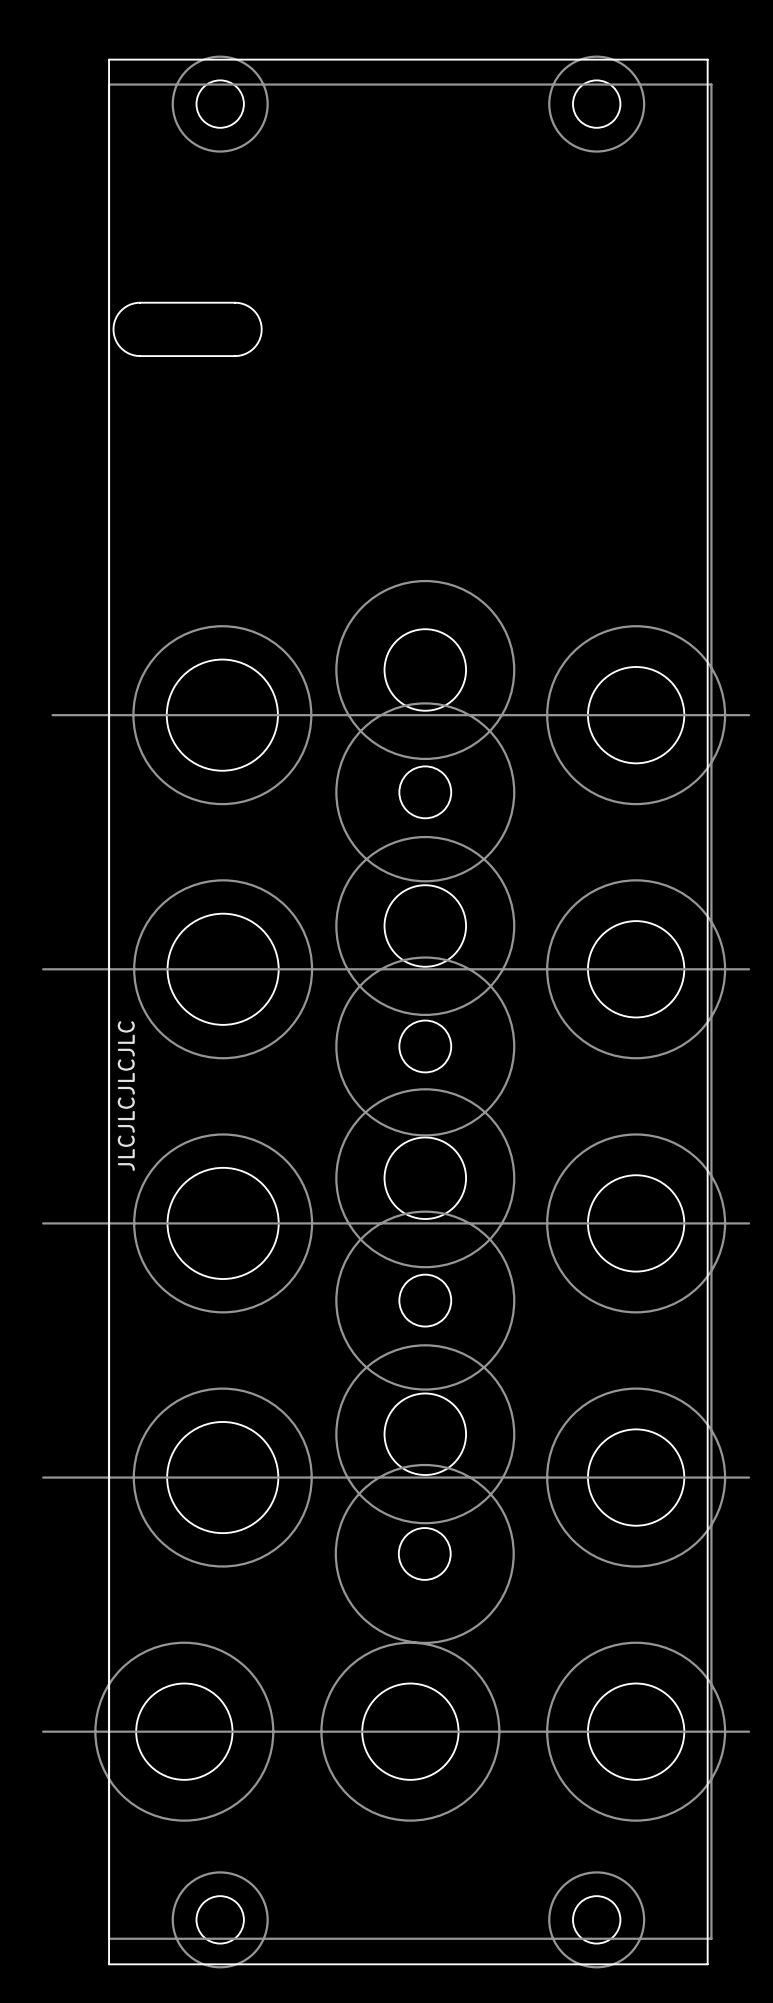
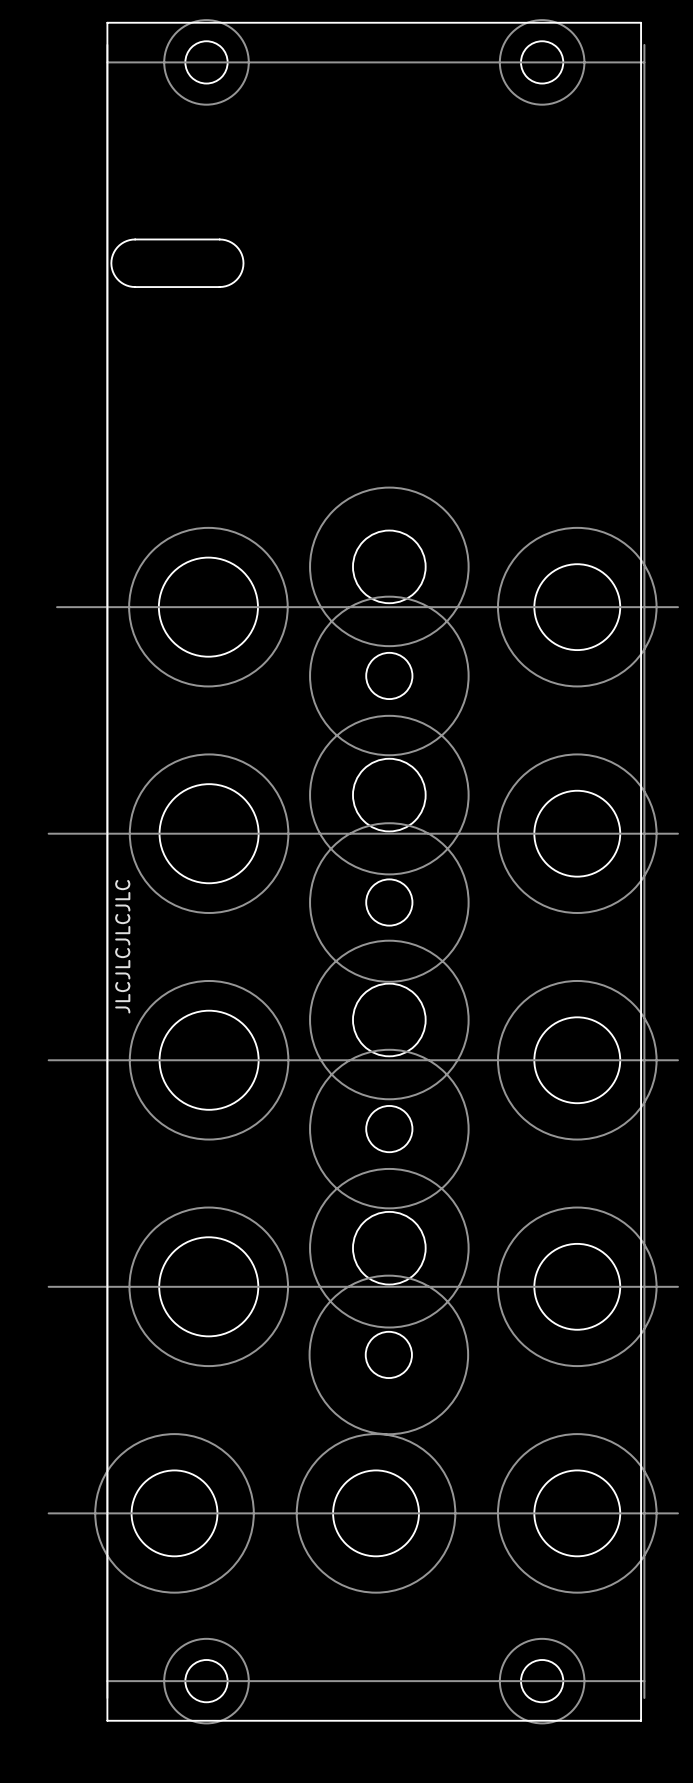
line: (109, 84) (711, 84) -> (107, 62) (644, 62)
line: (109, 1938) (711, 1938) -> (107, 1681) (644, 1681)

